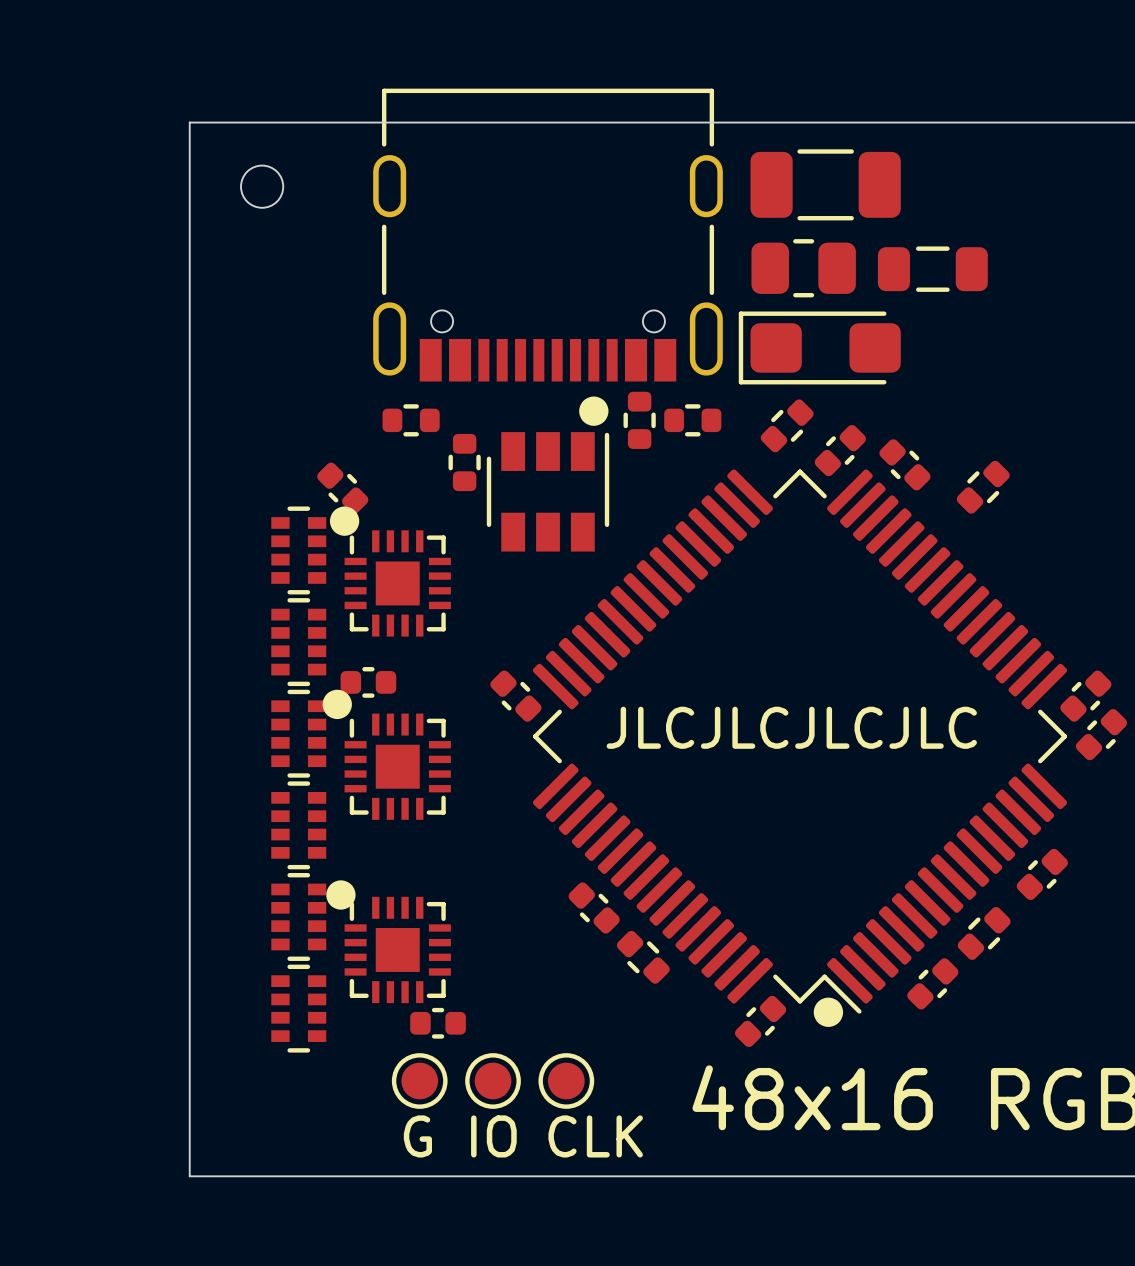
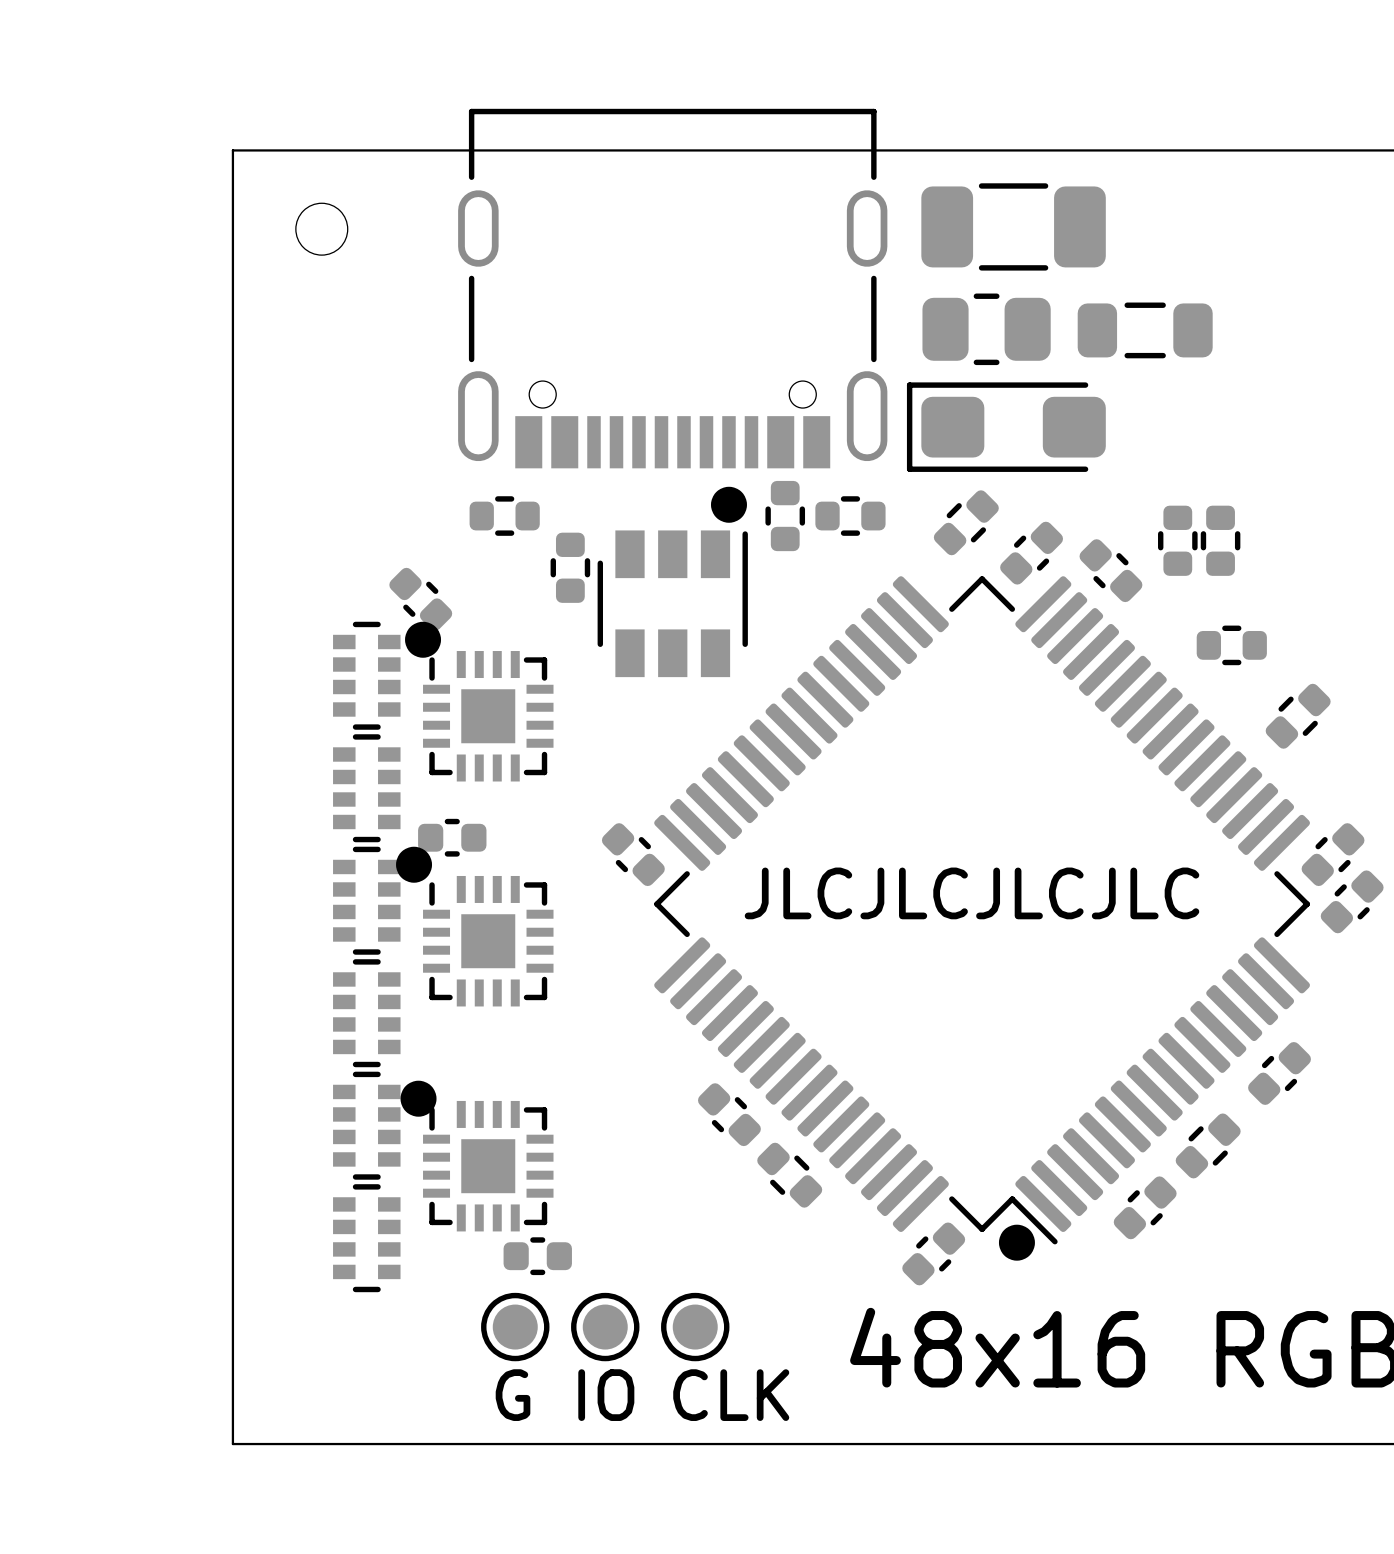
part: none -> (1177, 540)
part: none -> (1220, 540)
part position: (983, 487) -> (1298, 716)
part: none -> (1231, 645)

